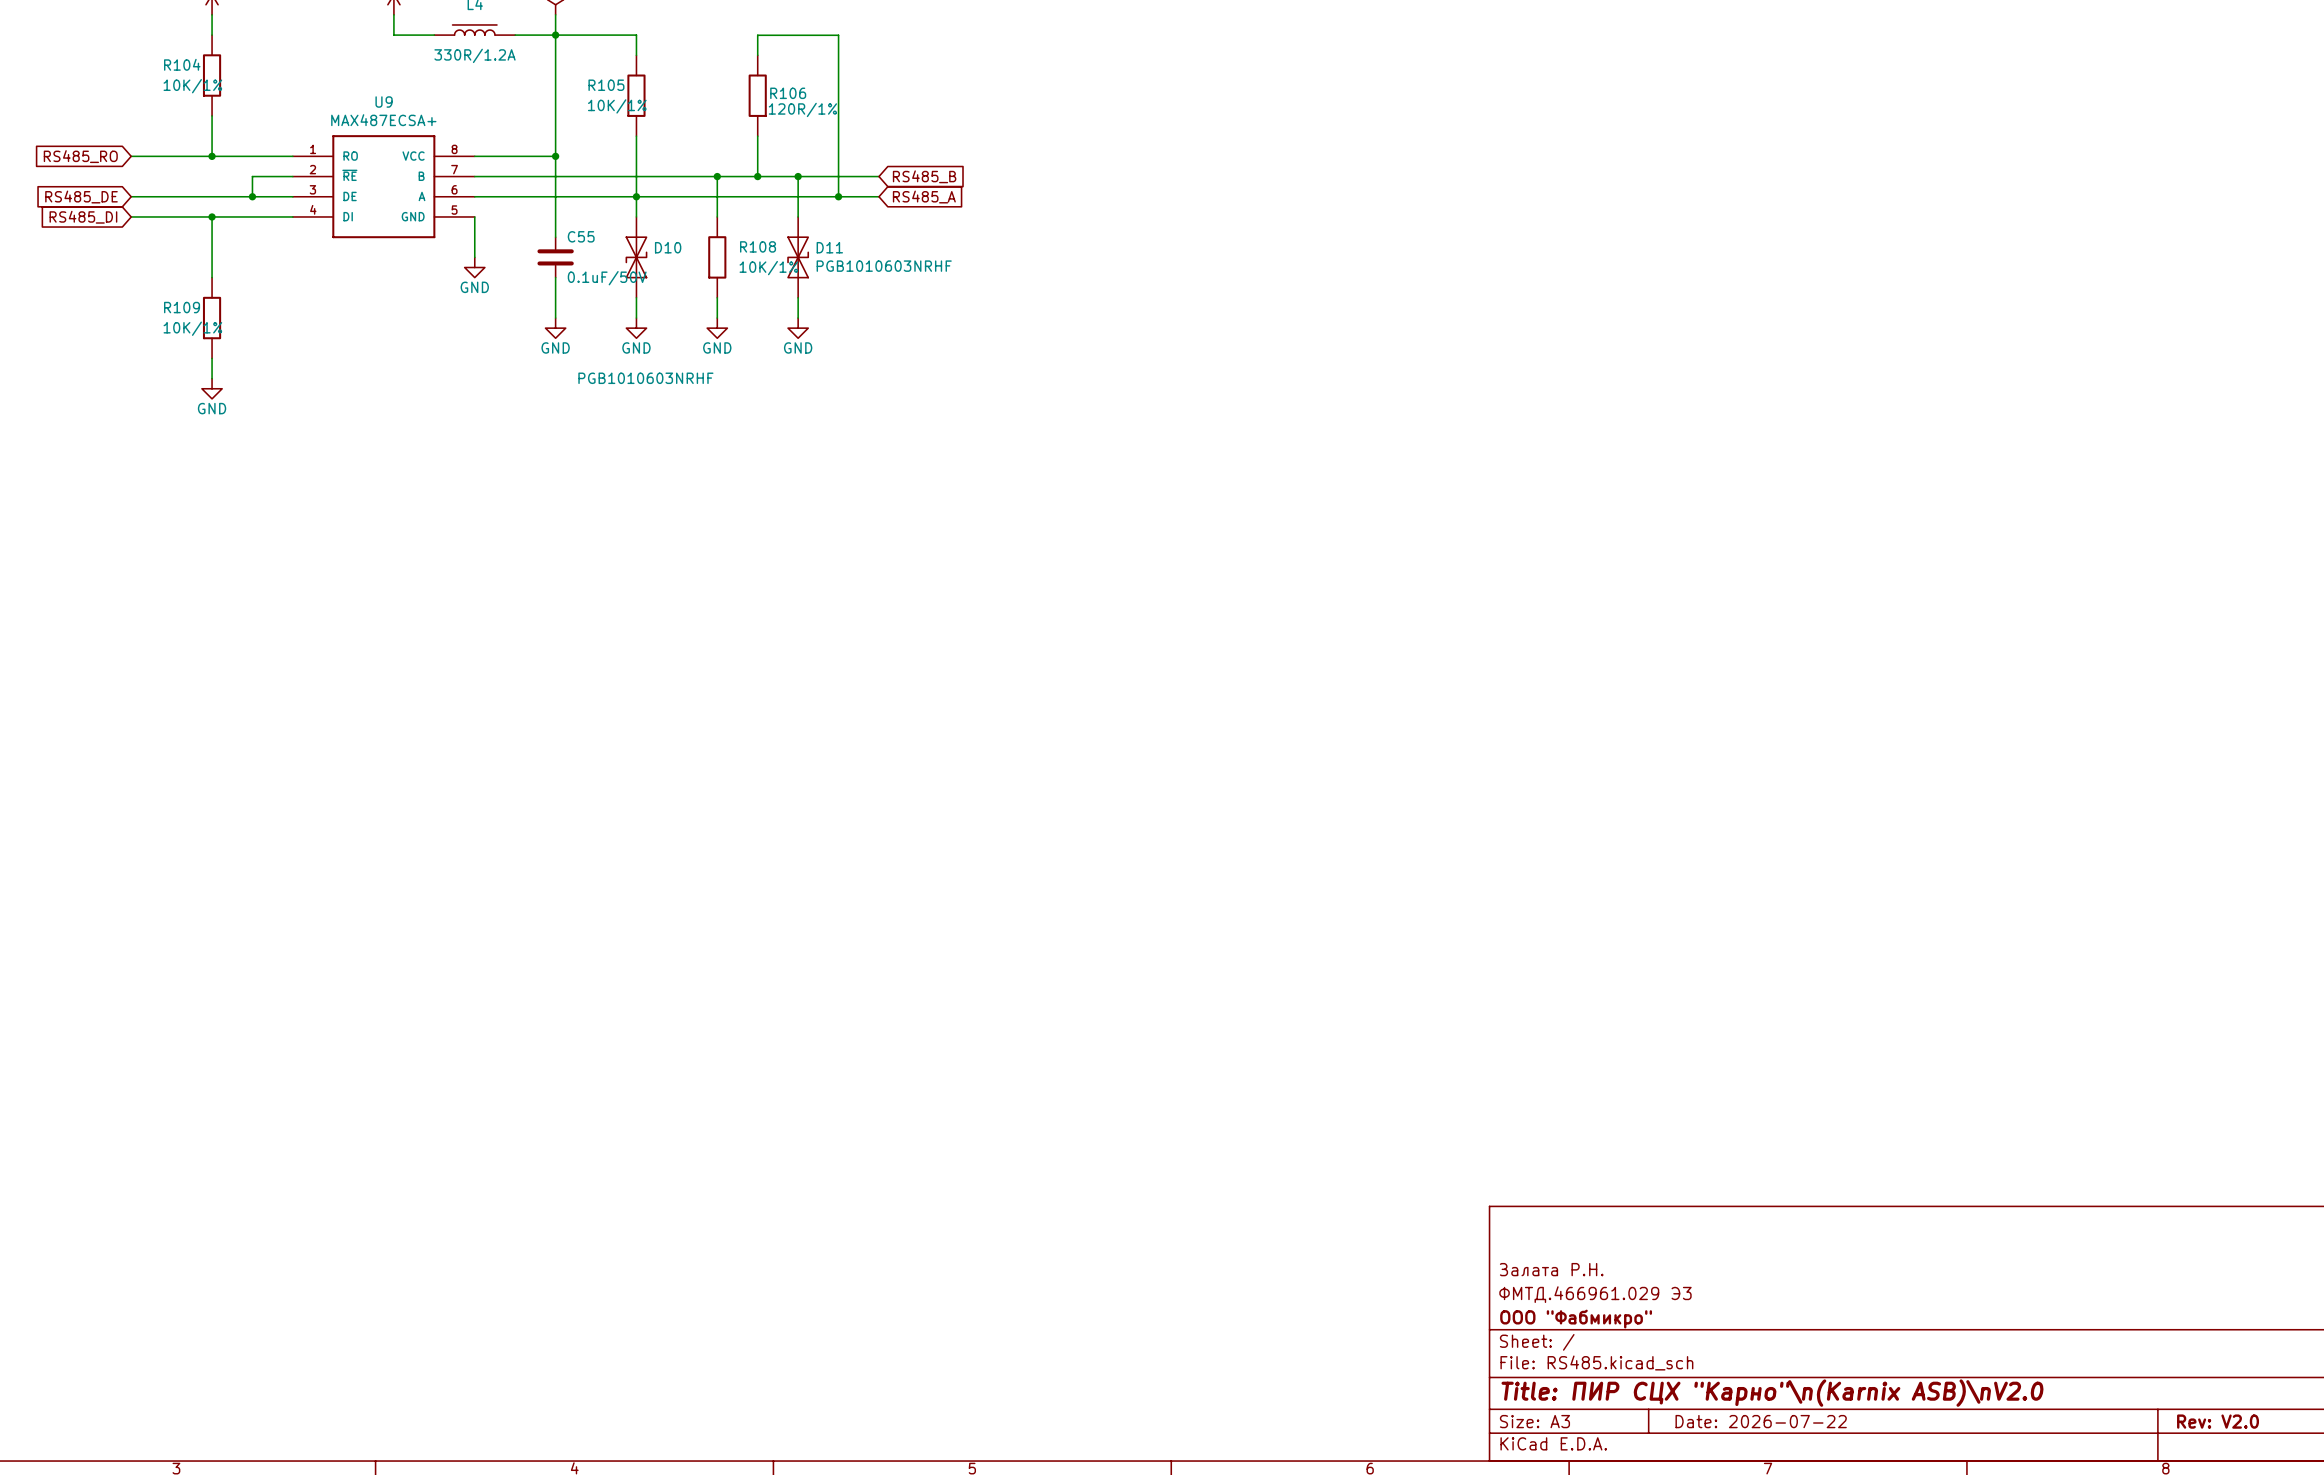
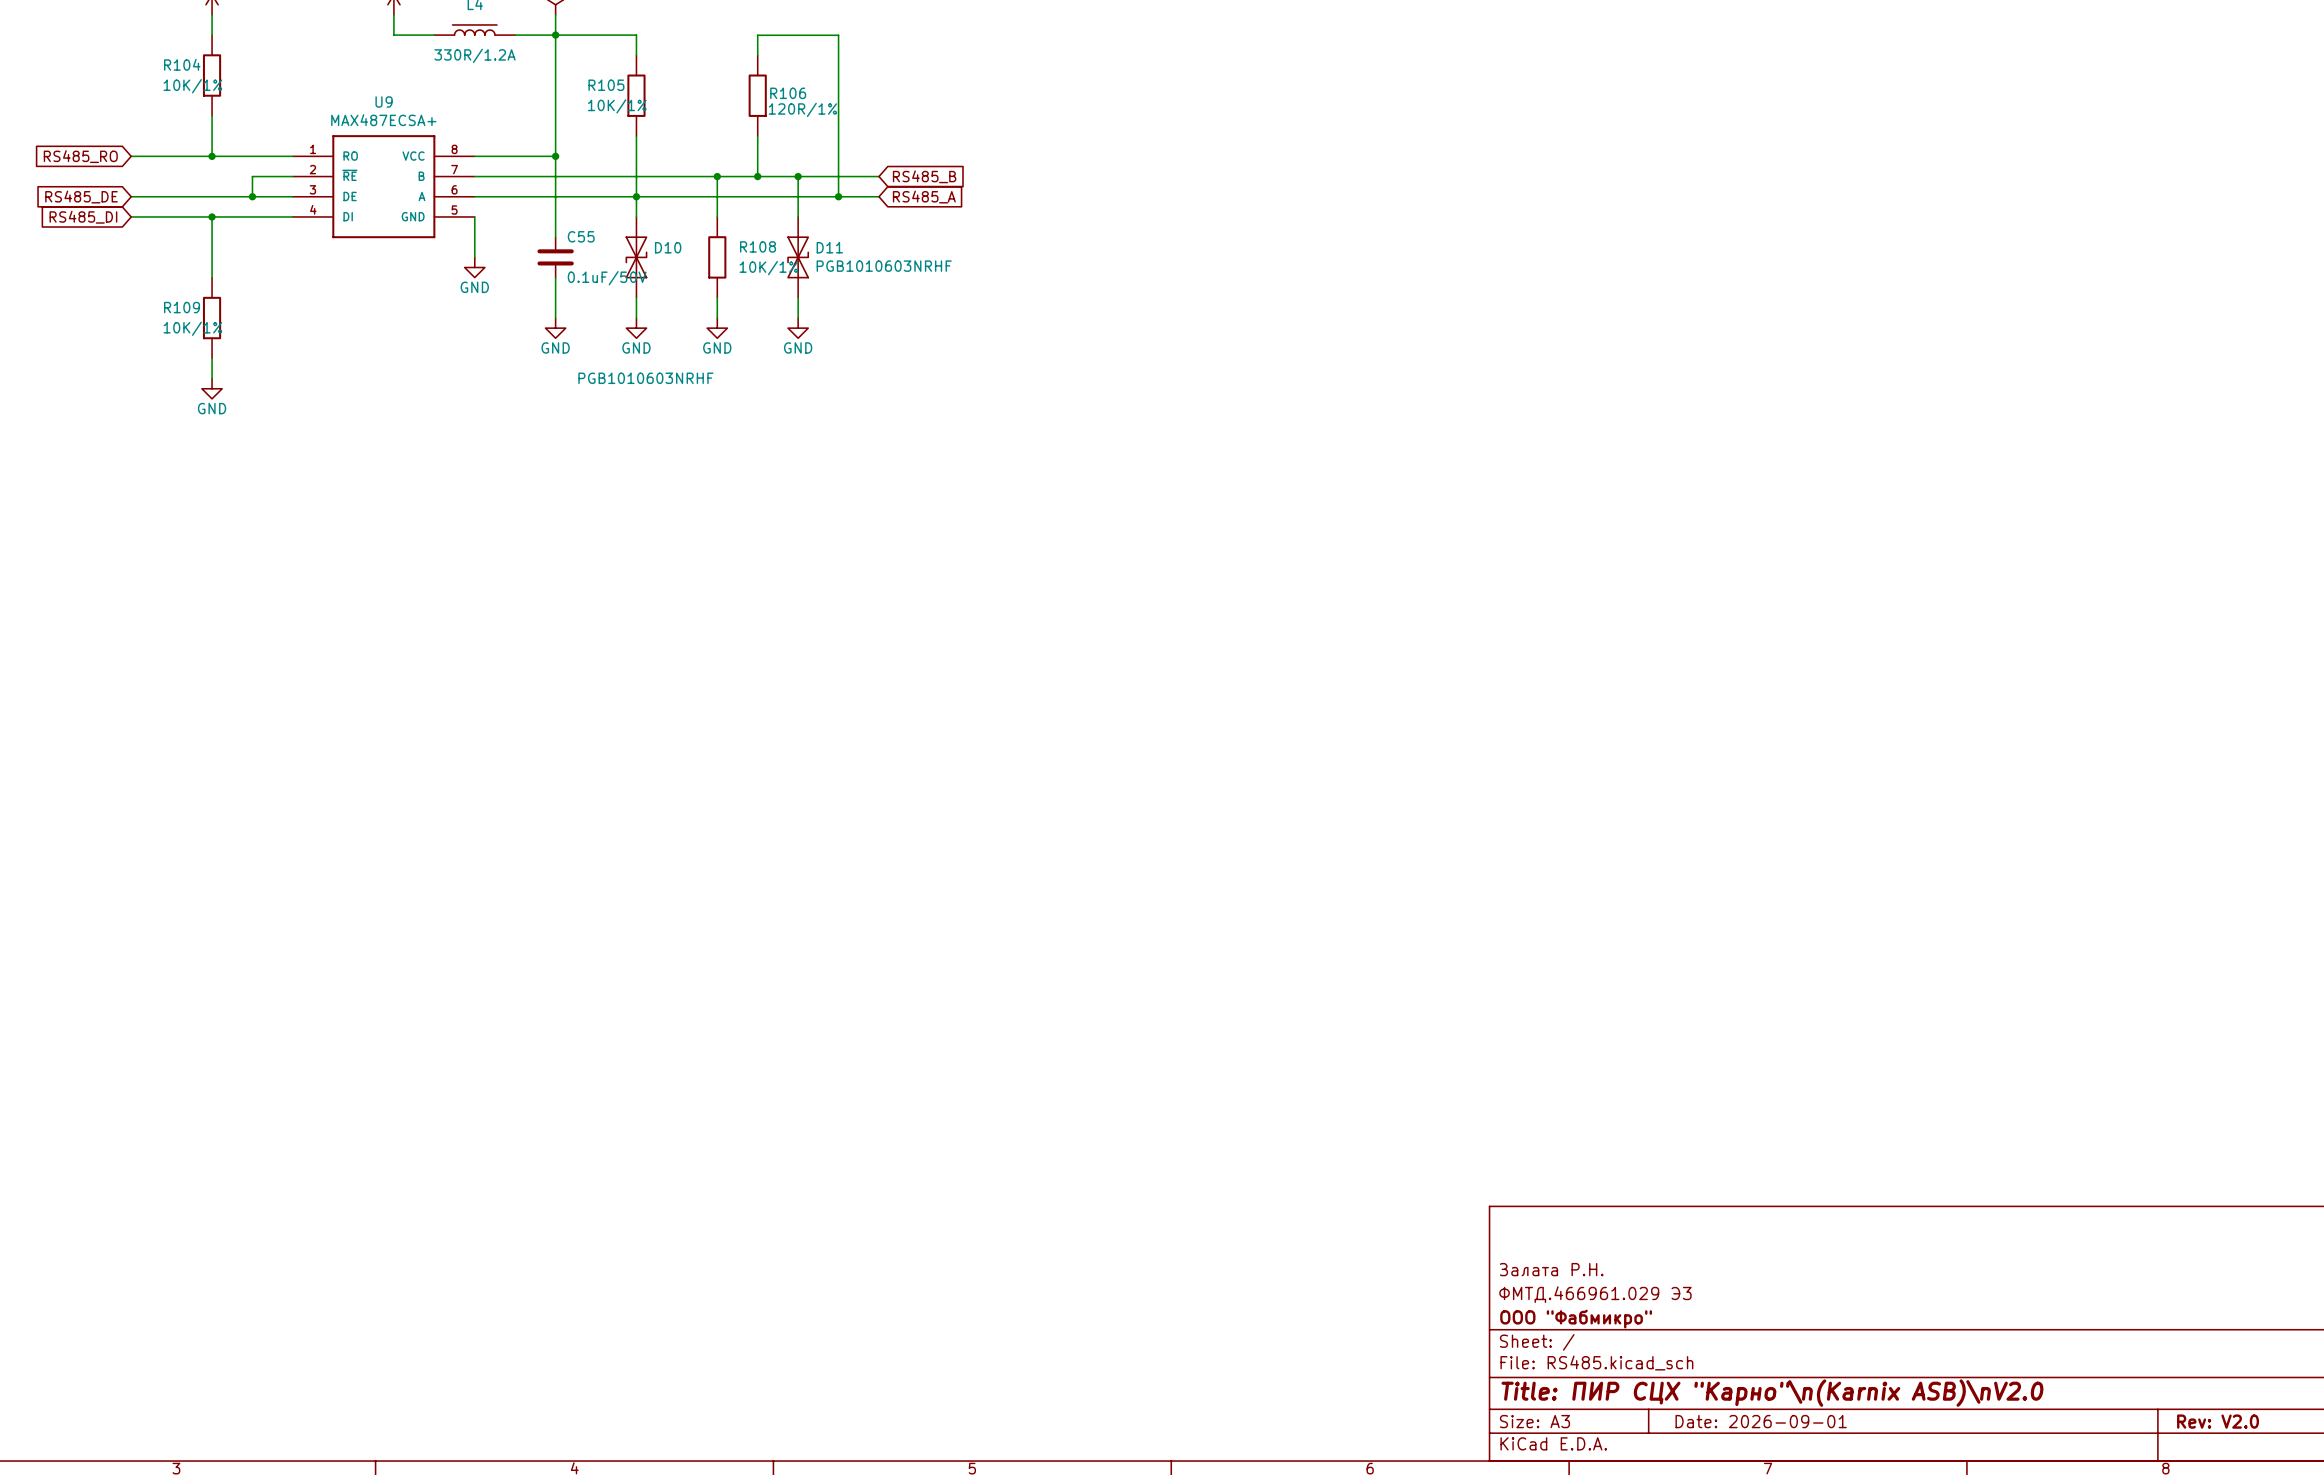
title block: Date: 2026-07-22 (1761, 1421) -> Date: 2026-09-01 (1761, 1421)

